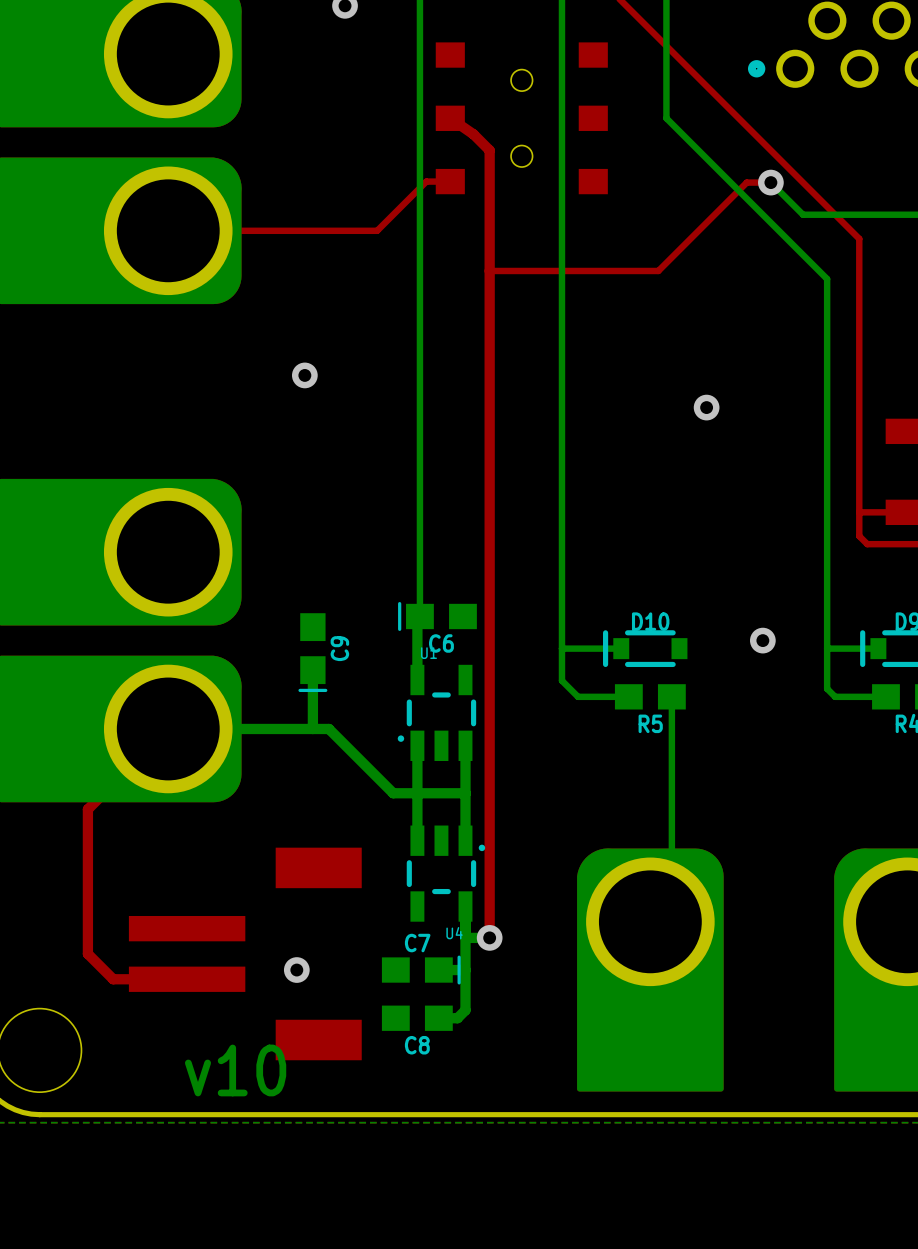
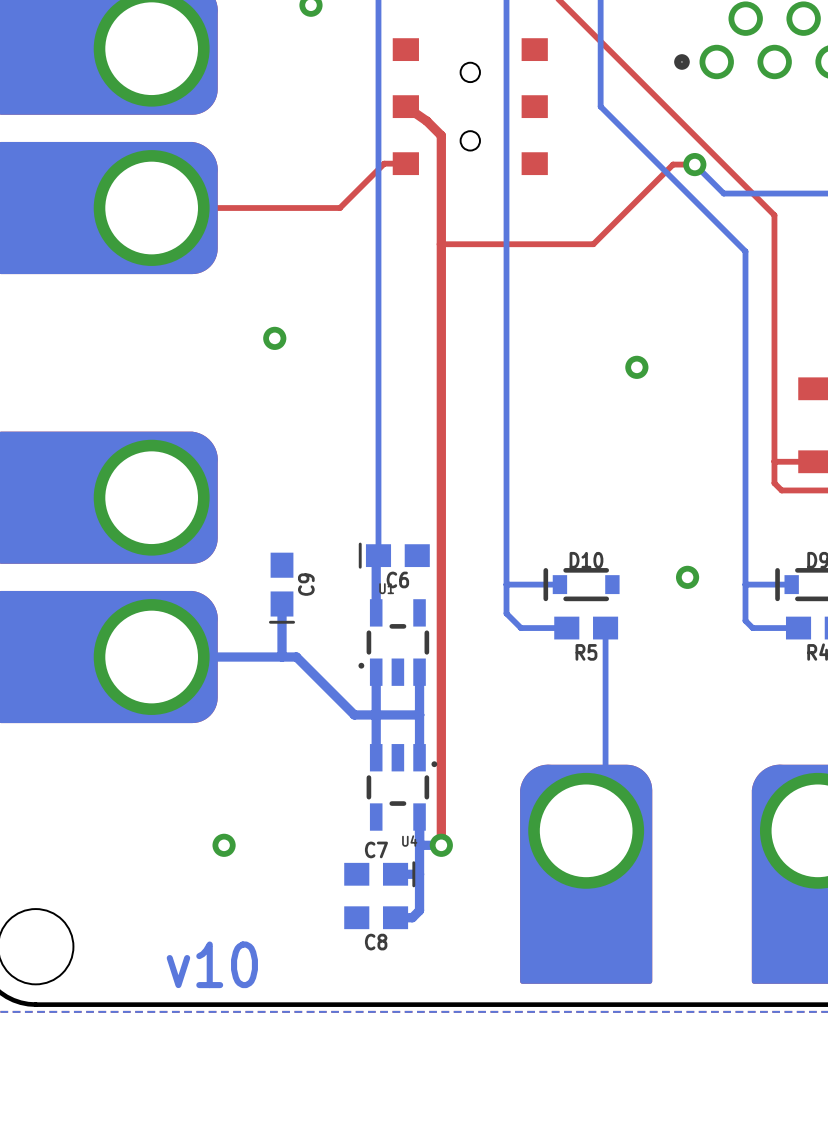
top track: (168, 728) (87, 809) (87, 953) (113, 979) (187, 979) -> none
part: (245, 953) -> none
via position: (296, 970) -> (224, 845)

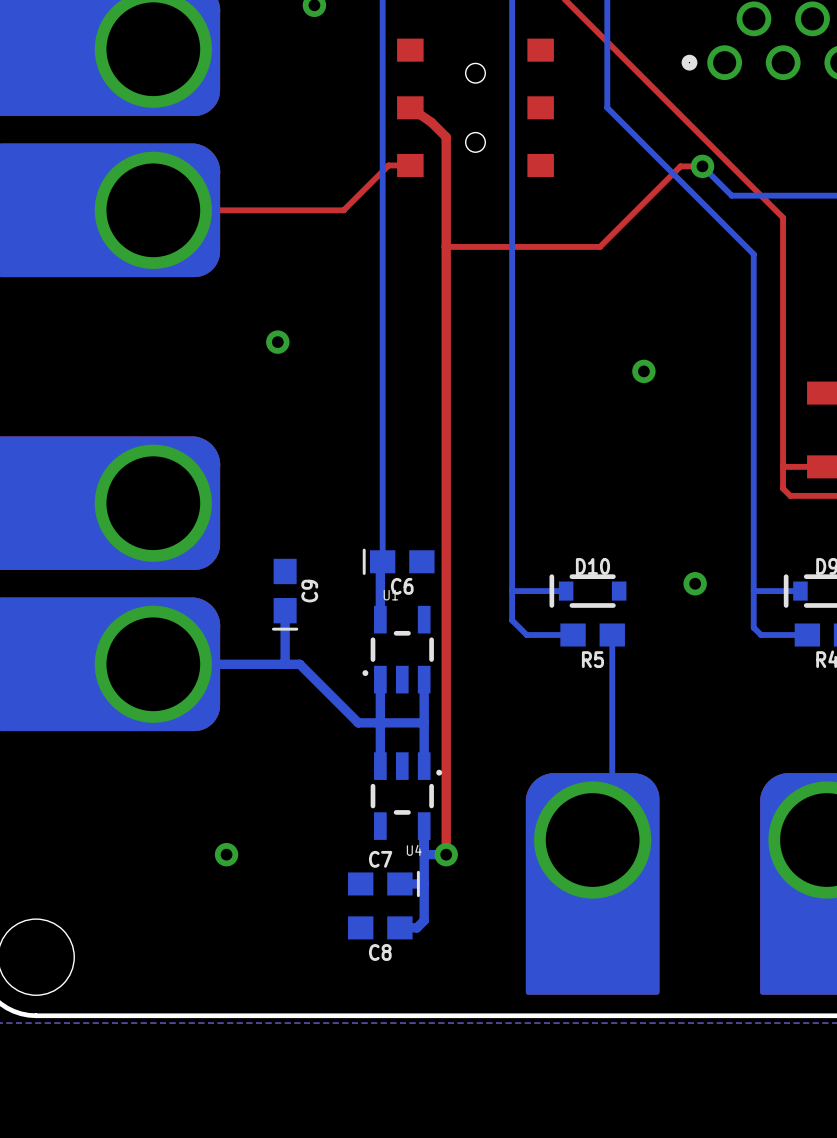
text: v10 (212, 964) -> none

